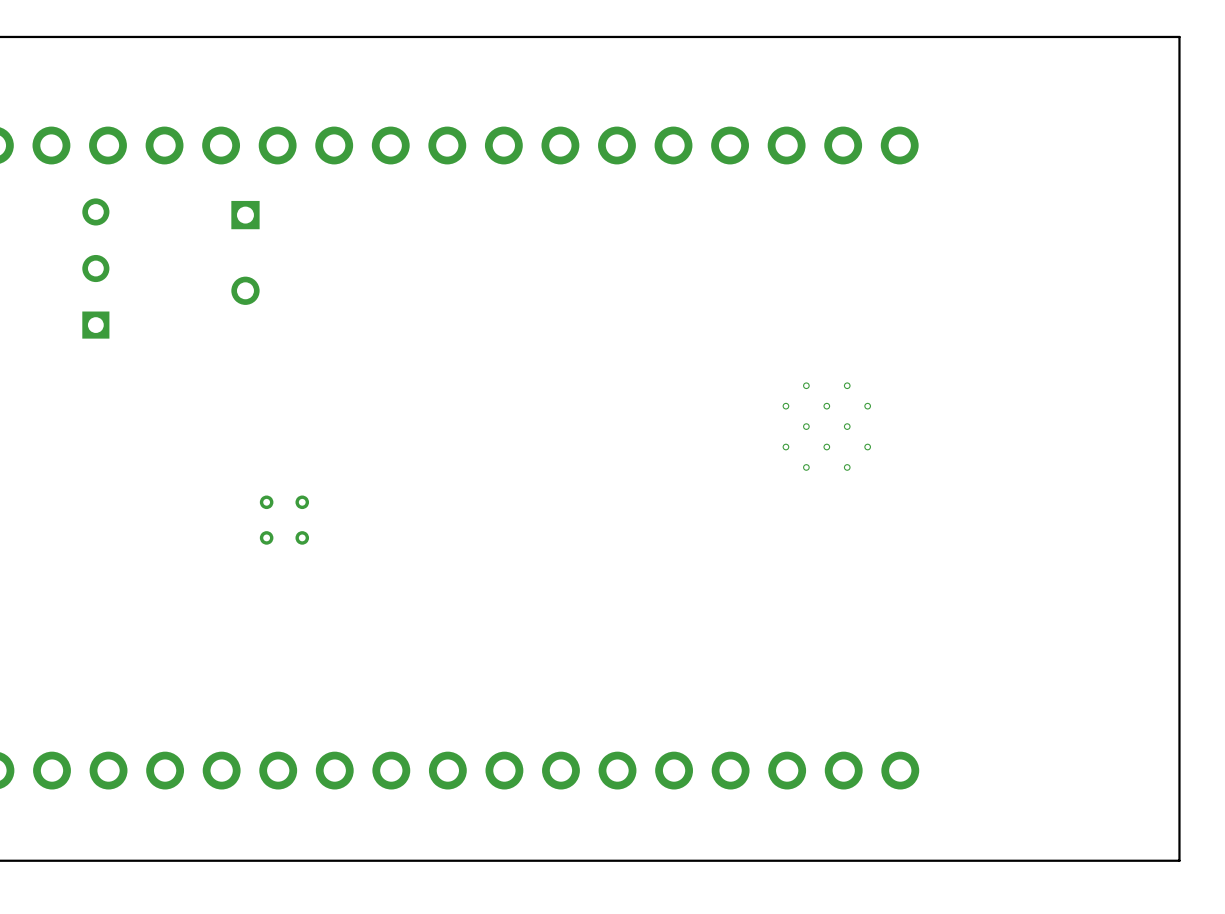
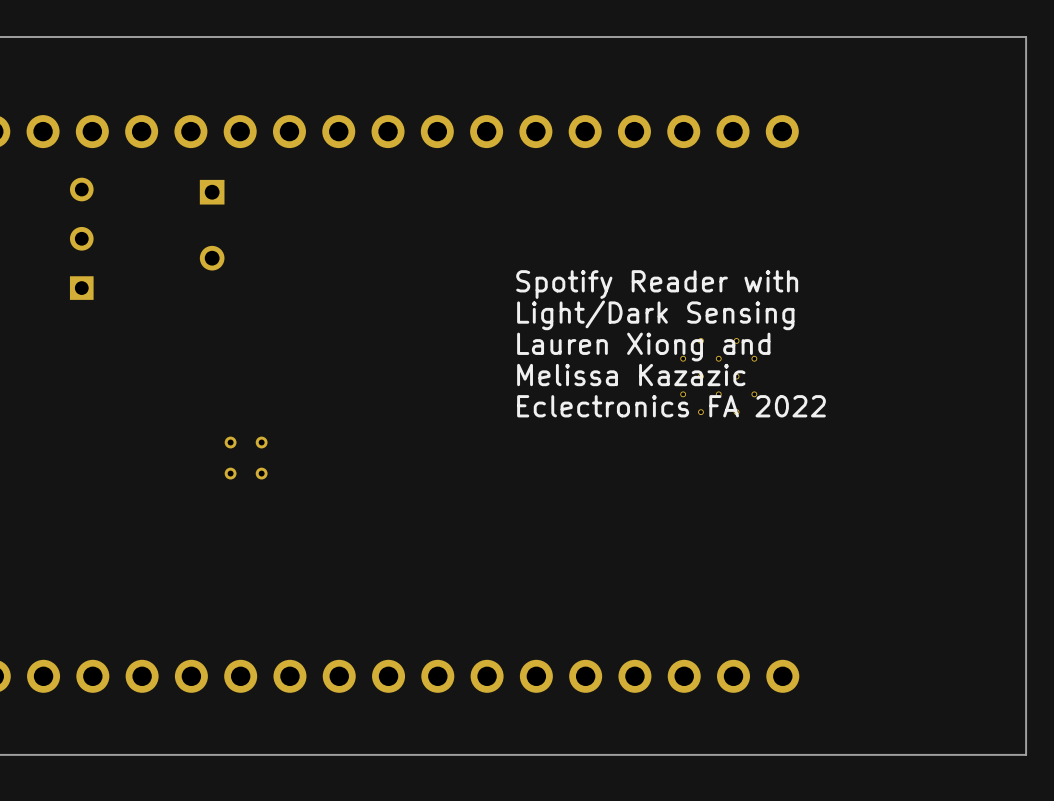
text: none -> Spotify Reader with (657, 284)
text: none -> Light/Dark Sensing (655, 315)
text: none -> Lauren Xiong and (643, 347)
text: none -> Melissa Kazazic (631, 375)
text: none -> Eclectronics FA 2022 (671, 406)

